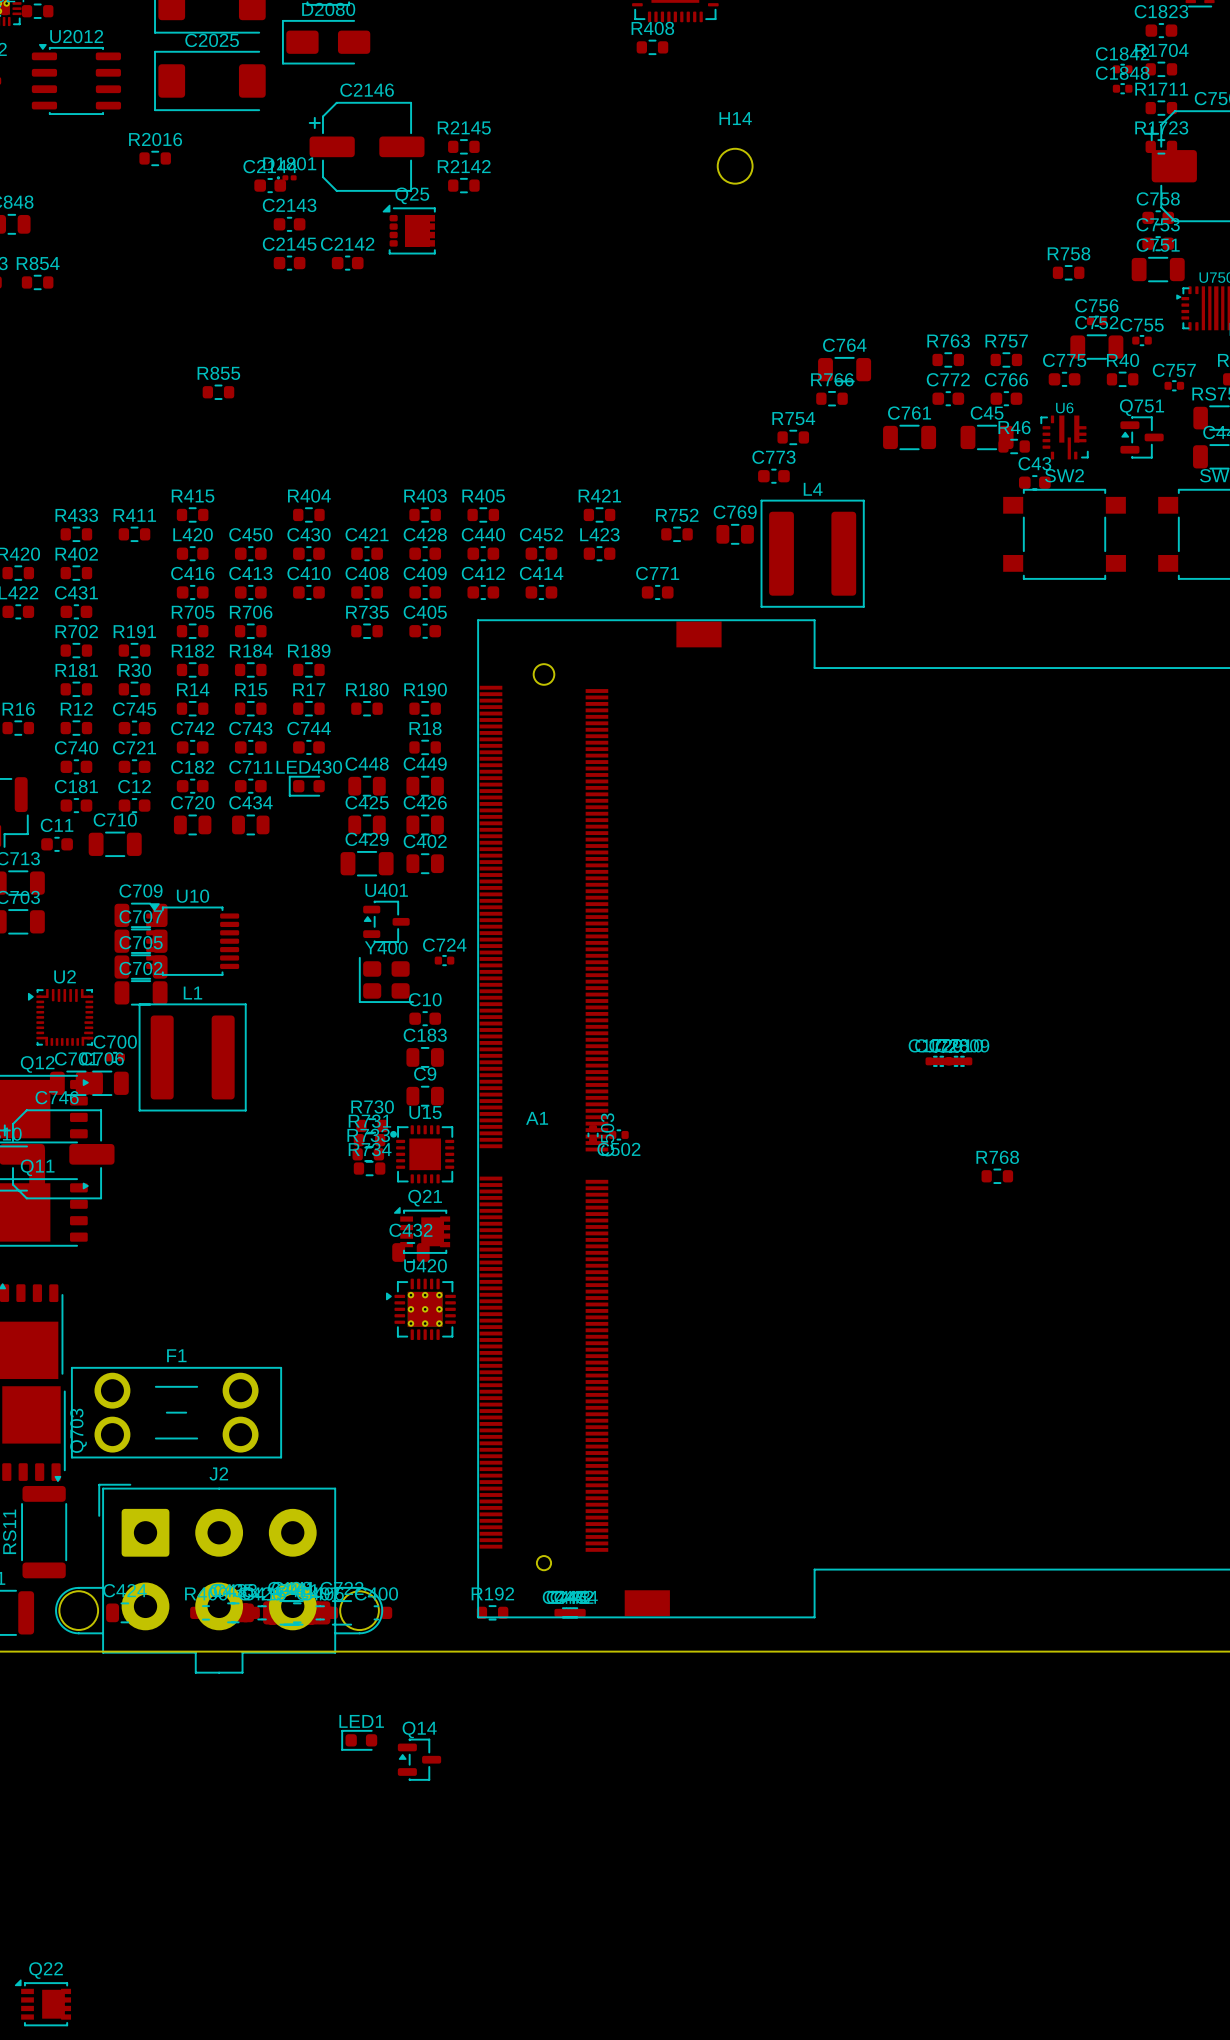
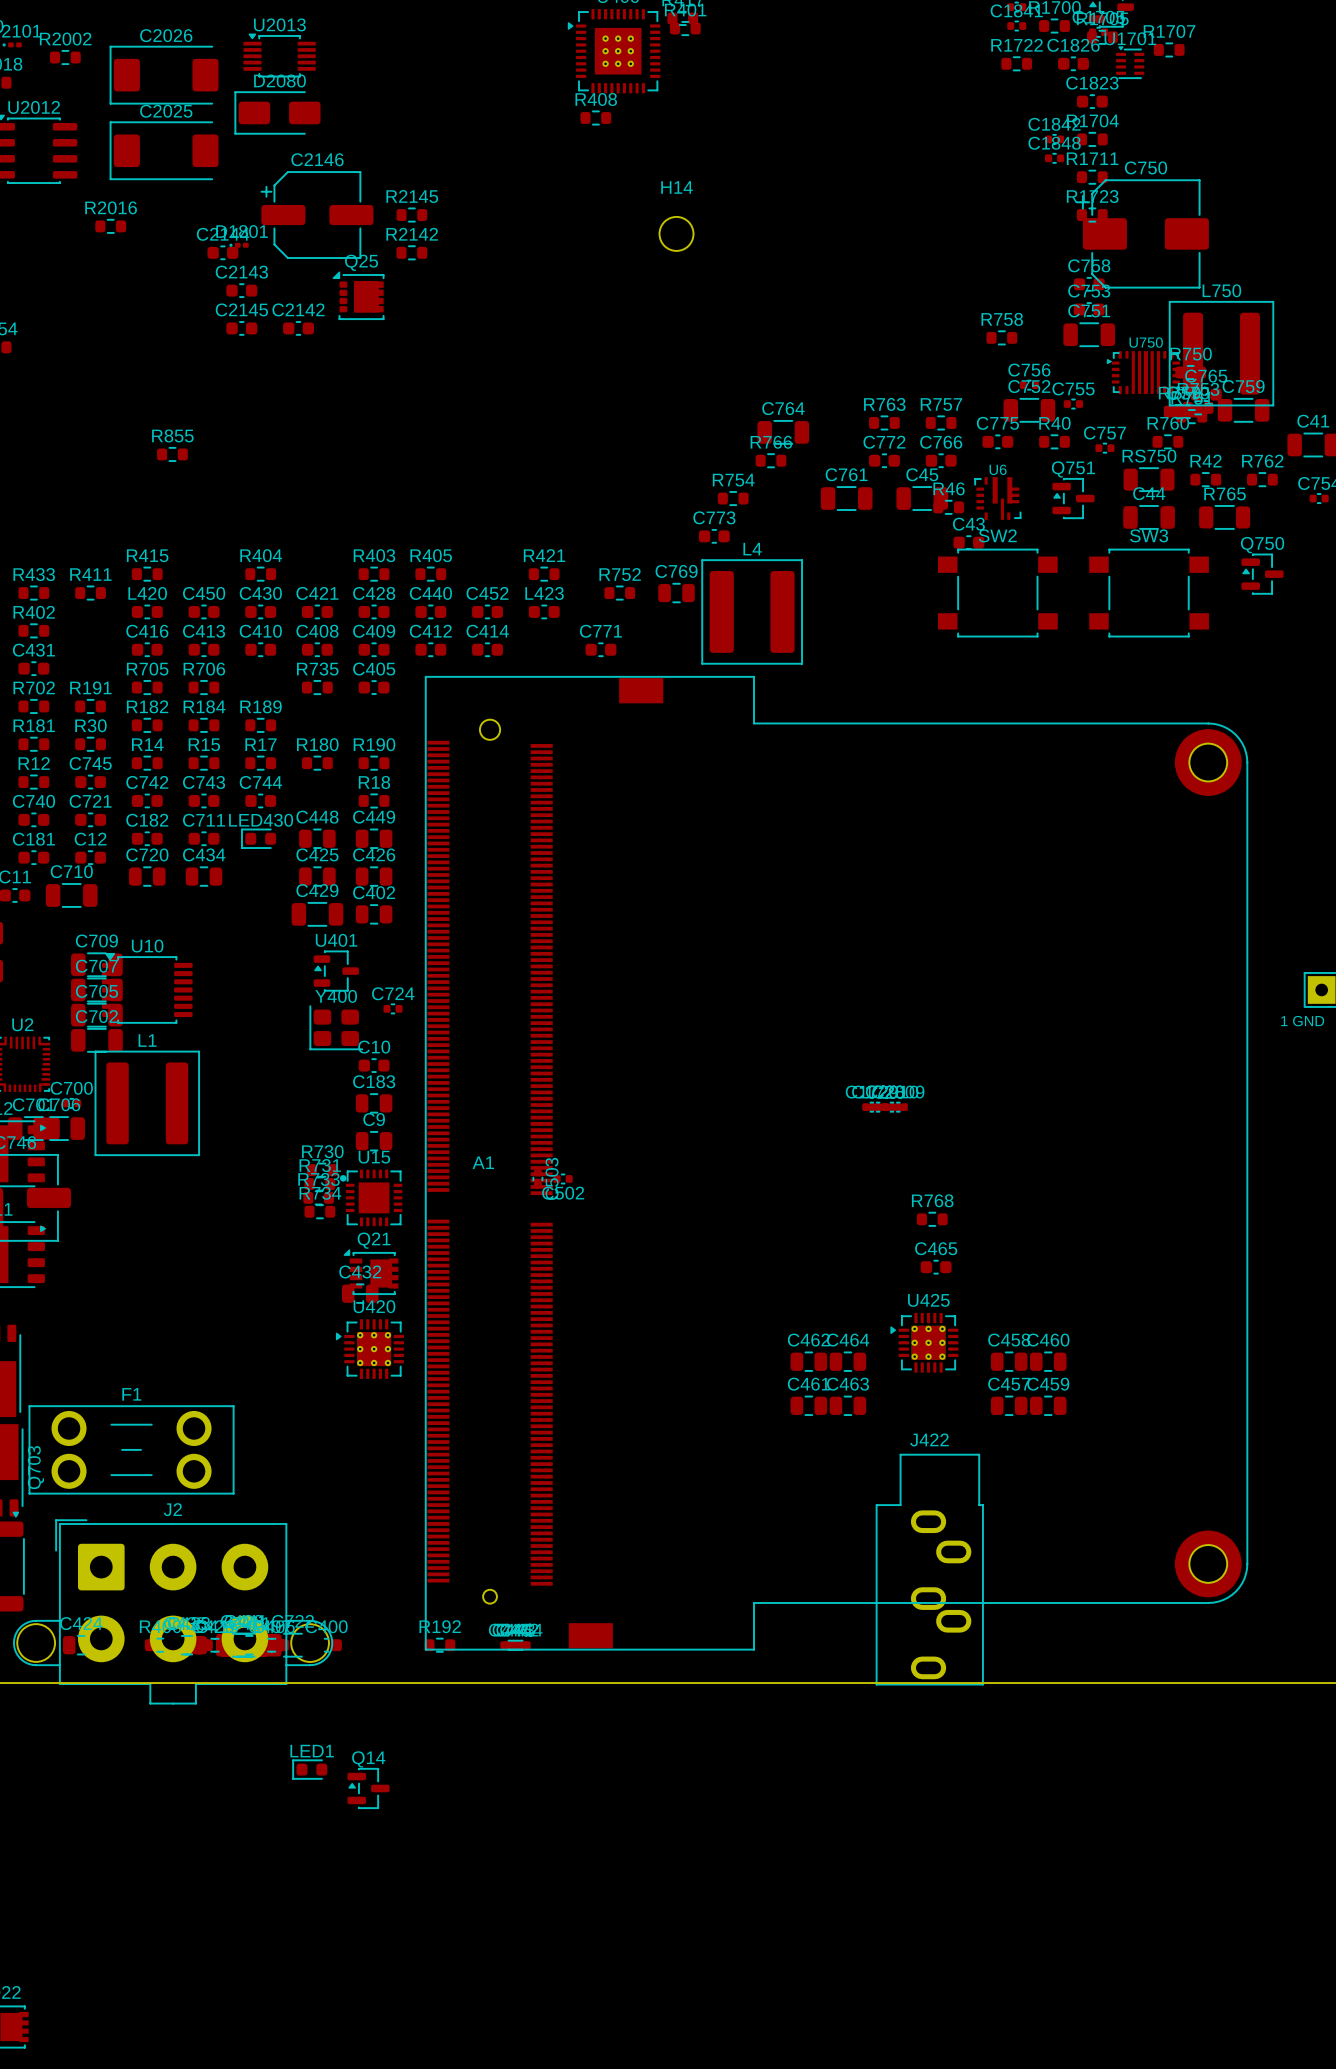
C465: none -> (936, 1267)
U425: none -> (924, 1342)
C462: none -> (808, 1361)
C464: none -> (847, 1361)
C458: none -> (1009, 1361)
C460: none -> (1048, 1361)
C461: none -> (808, 1405)
C463: none -> (847, 1405)
C457: none -> (1009, 1405)
C459: none -> (1048, 1405)
J422: none -> (929, 1569)

